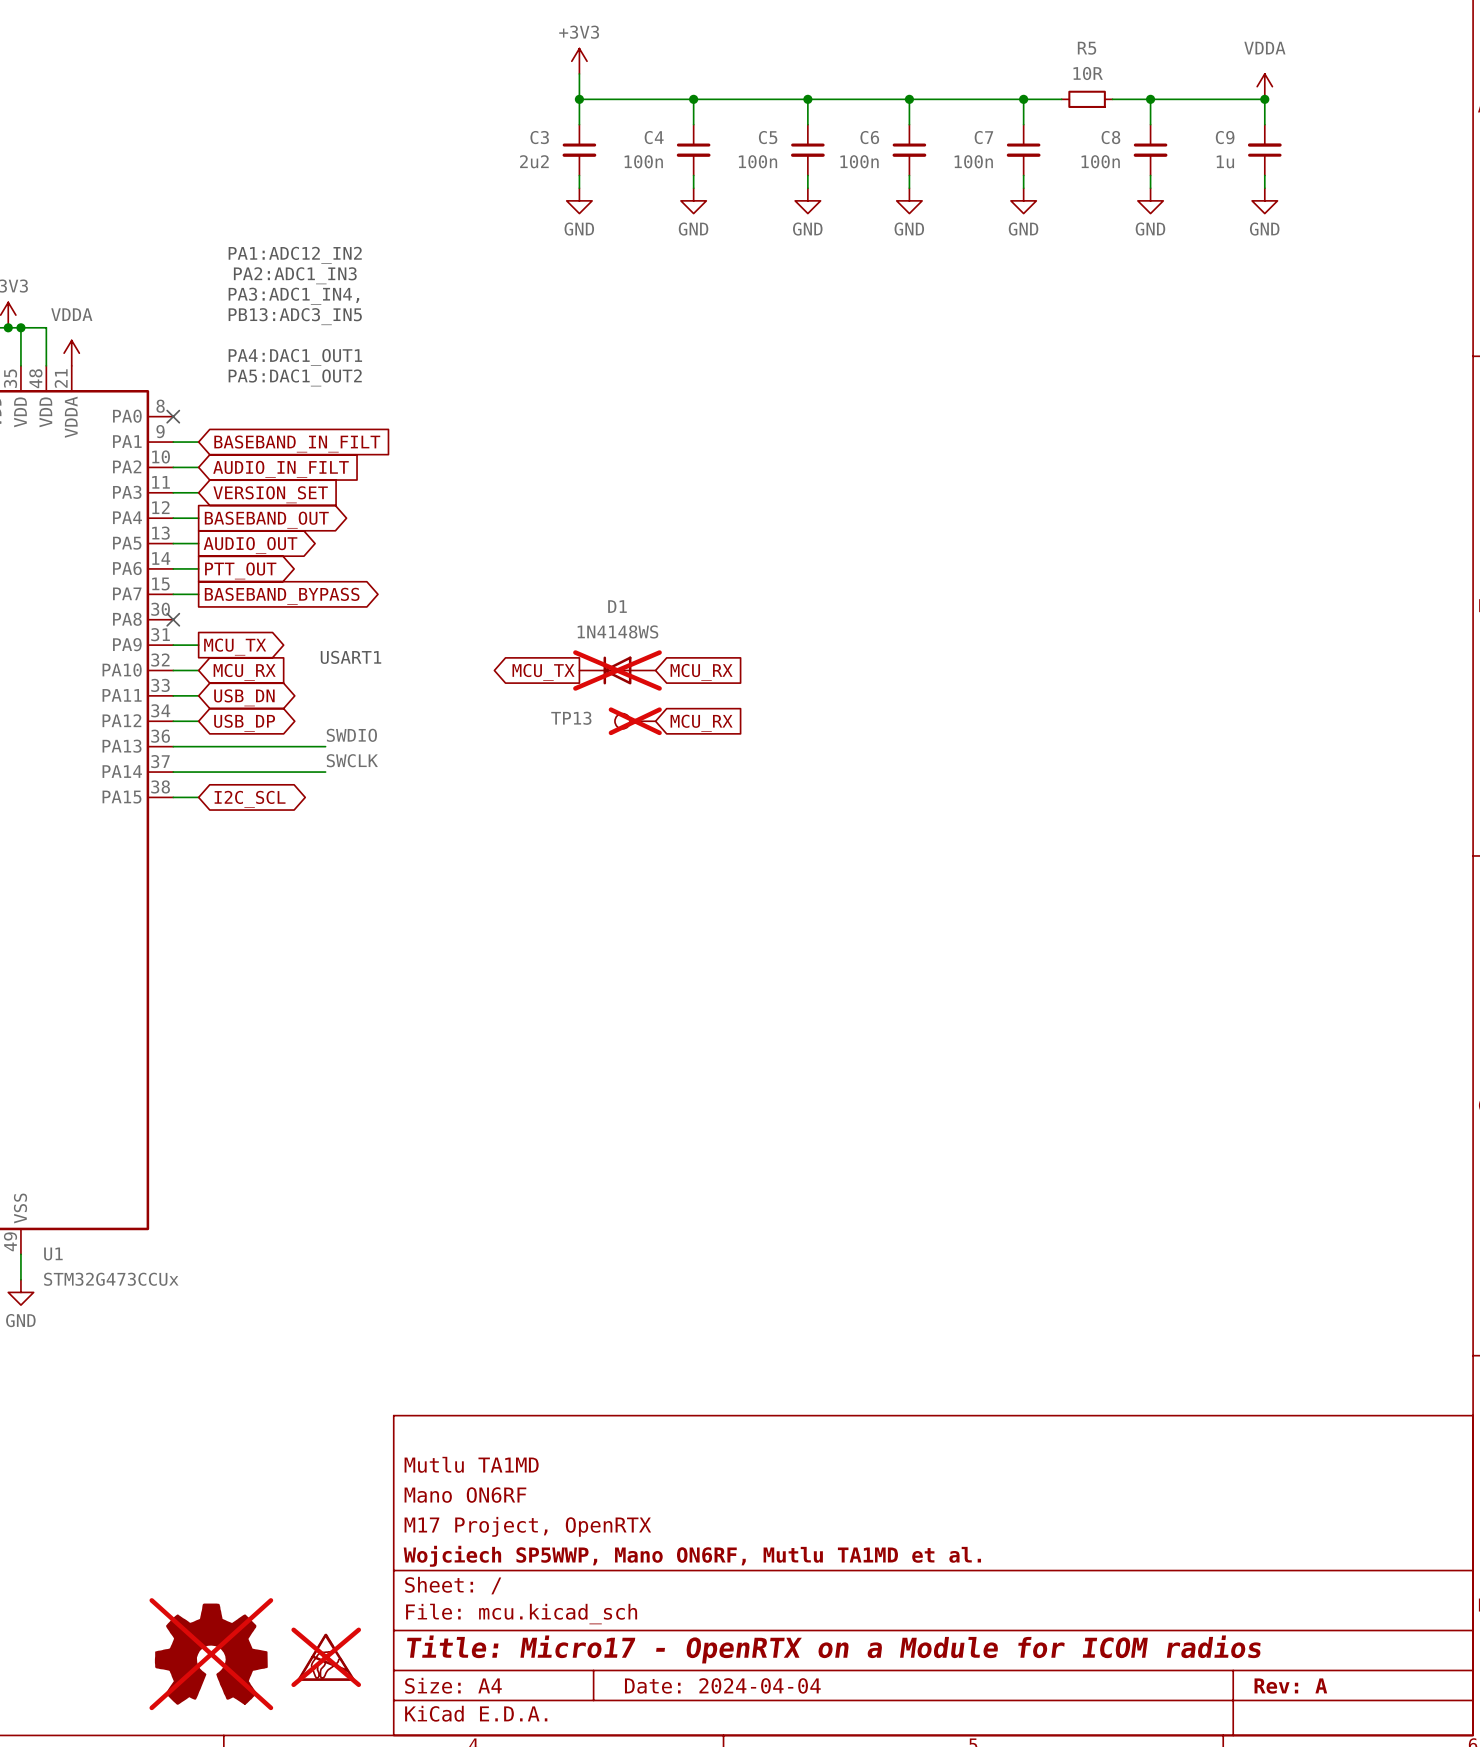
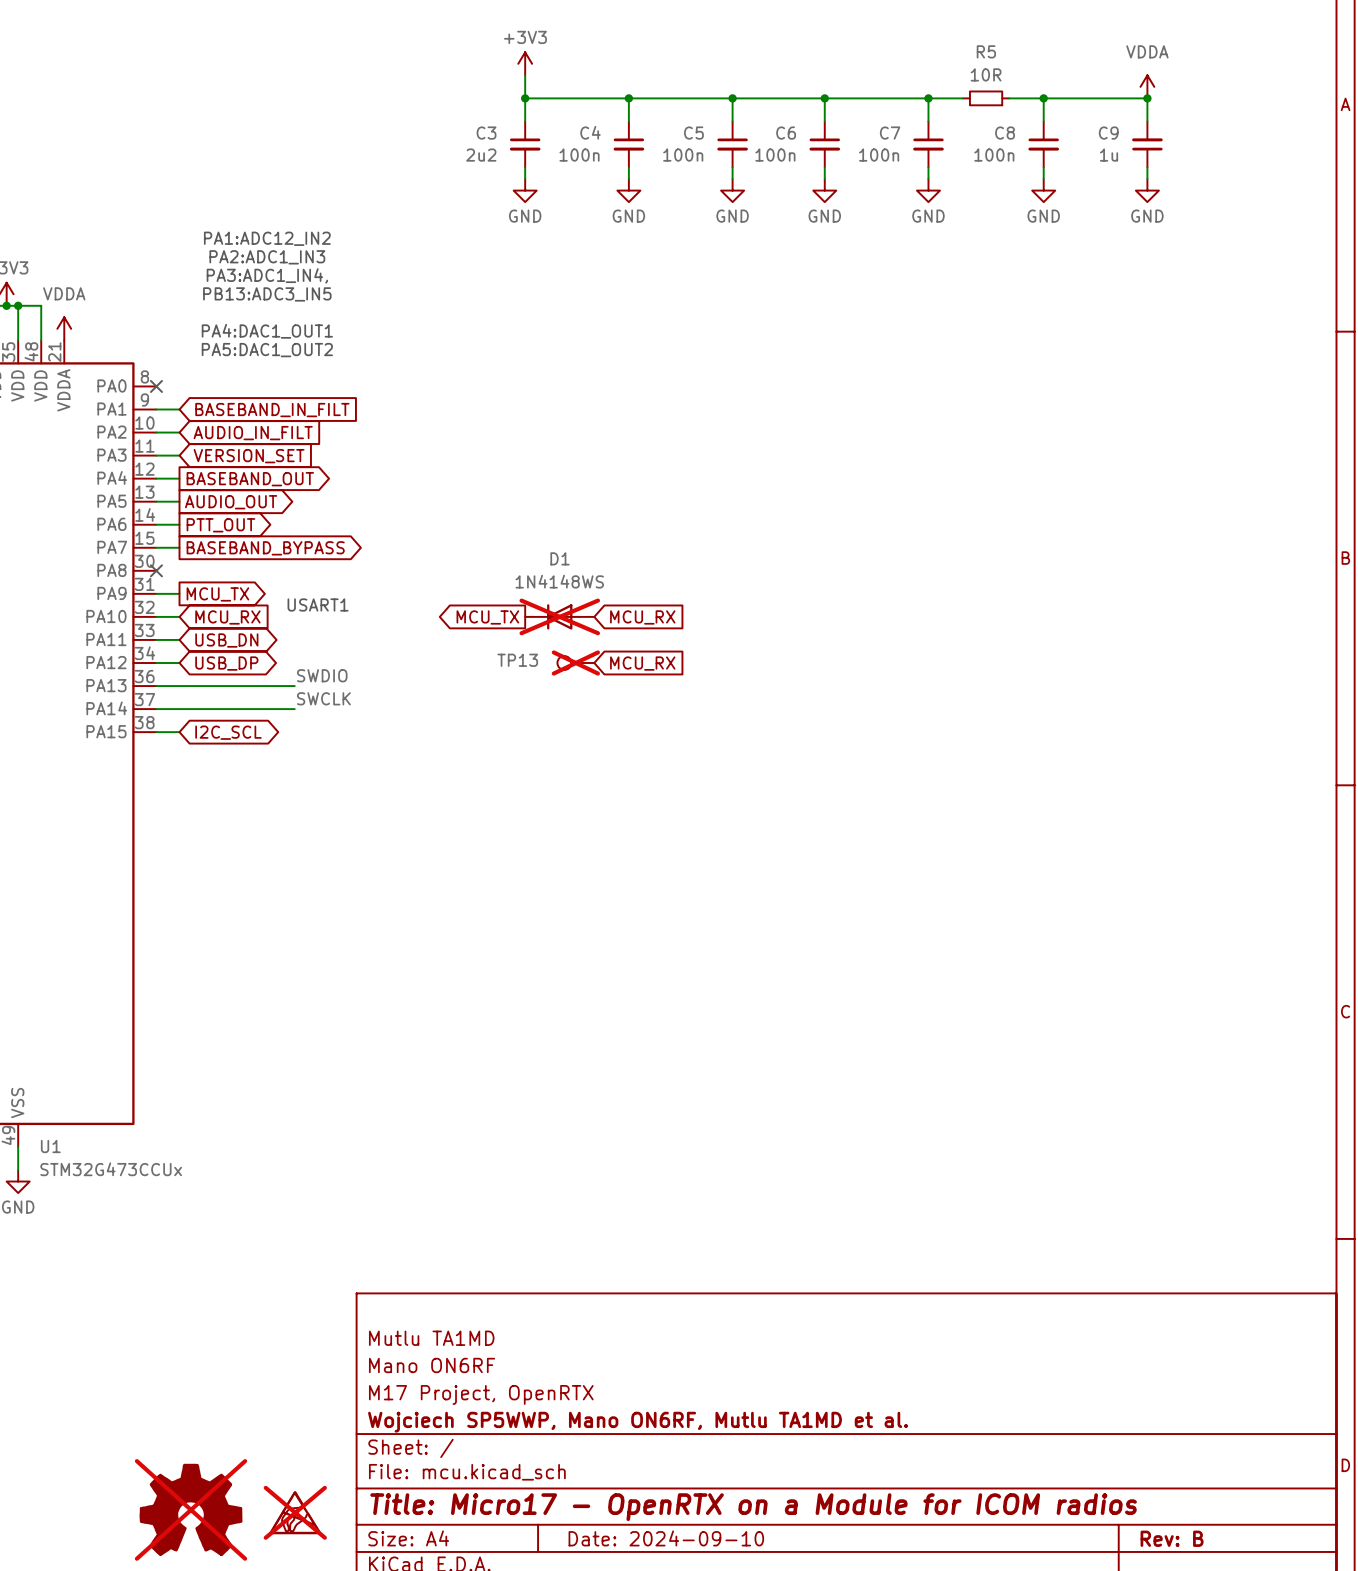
title block: Date: 2024-04-04 (722, 1685) -> Date: 2024-09-10 (666, 1538)
title block: Rev: A (1290, 1686) -> Rev: B (1172, 1538)

